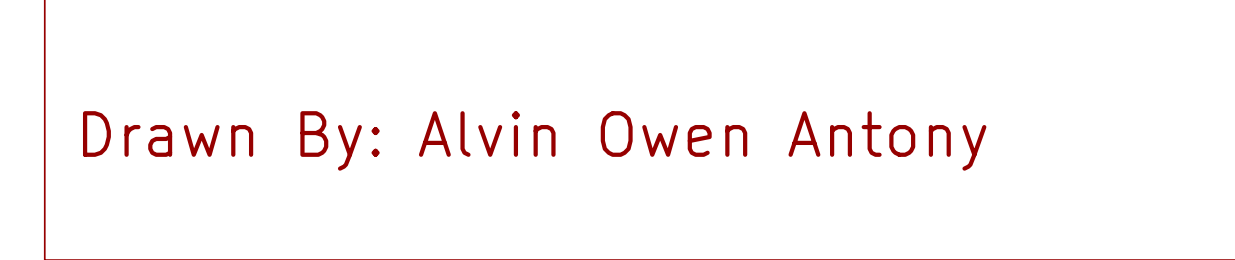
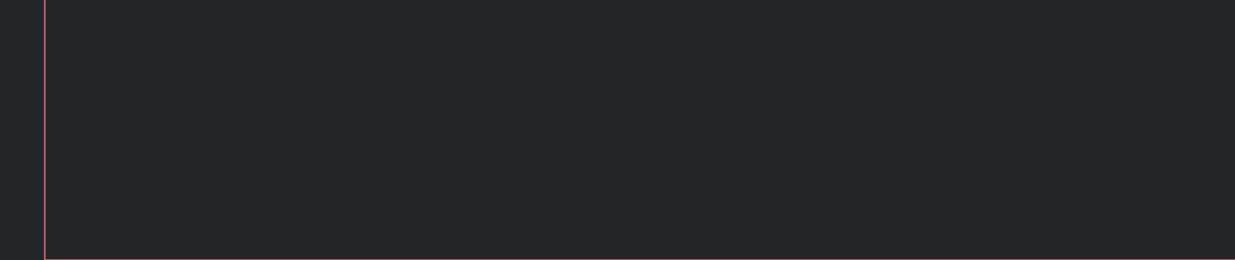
title block: Drawn By: Alvin Owen Antony (534, 140) -> none

